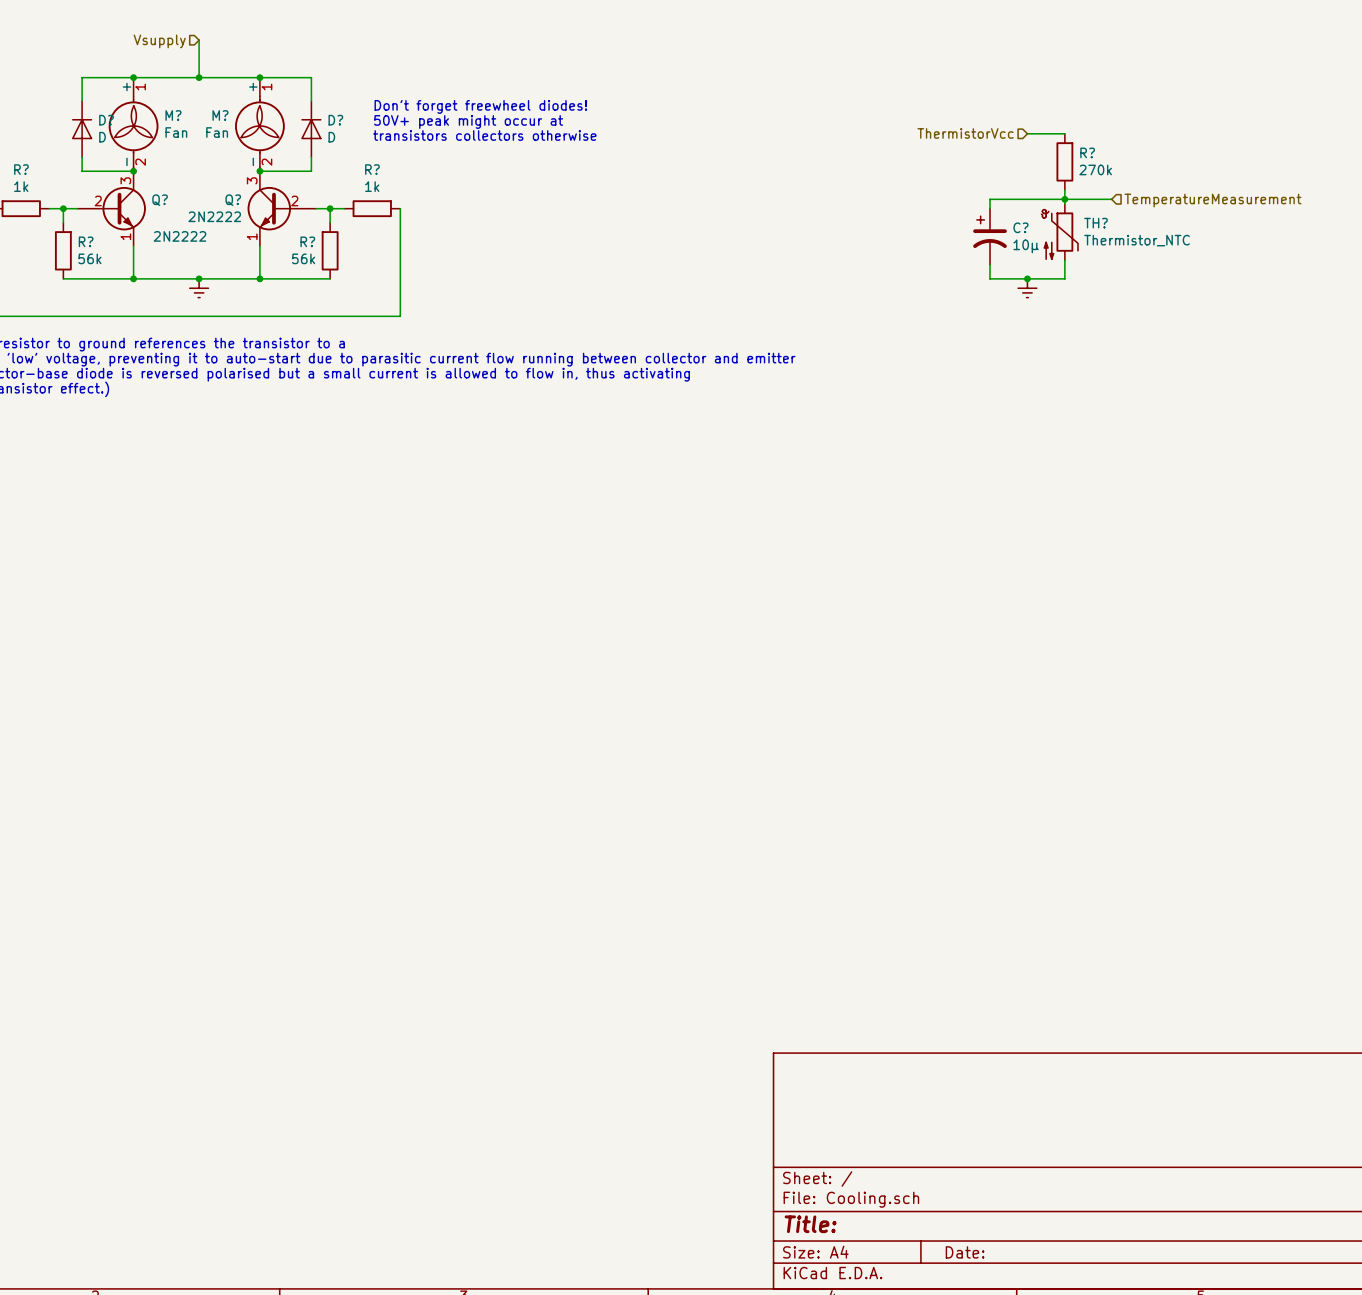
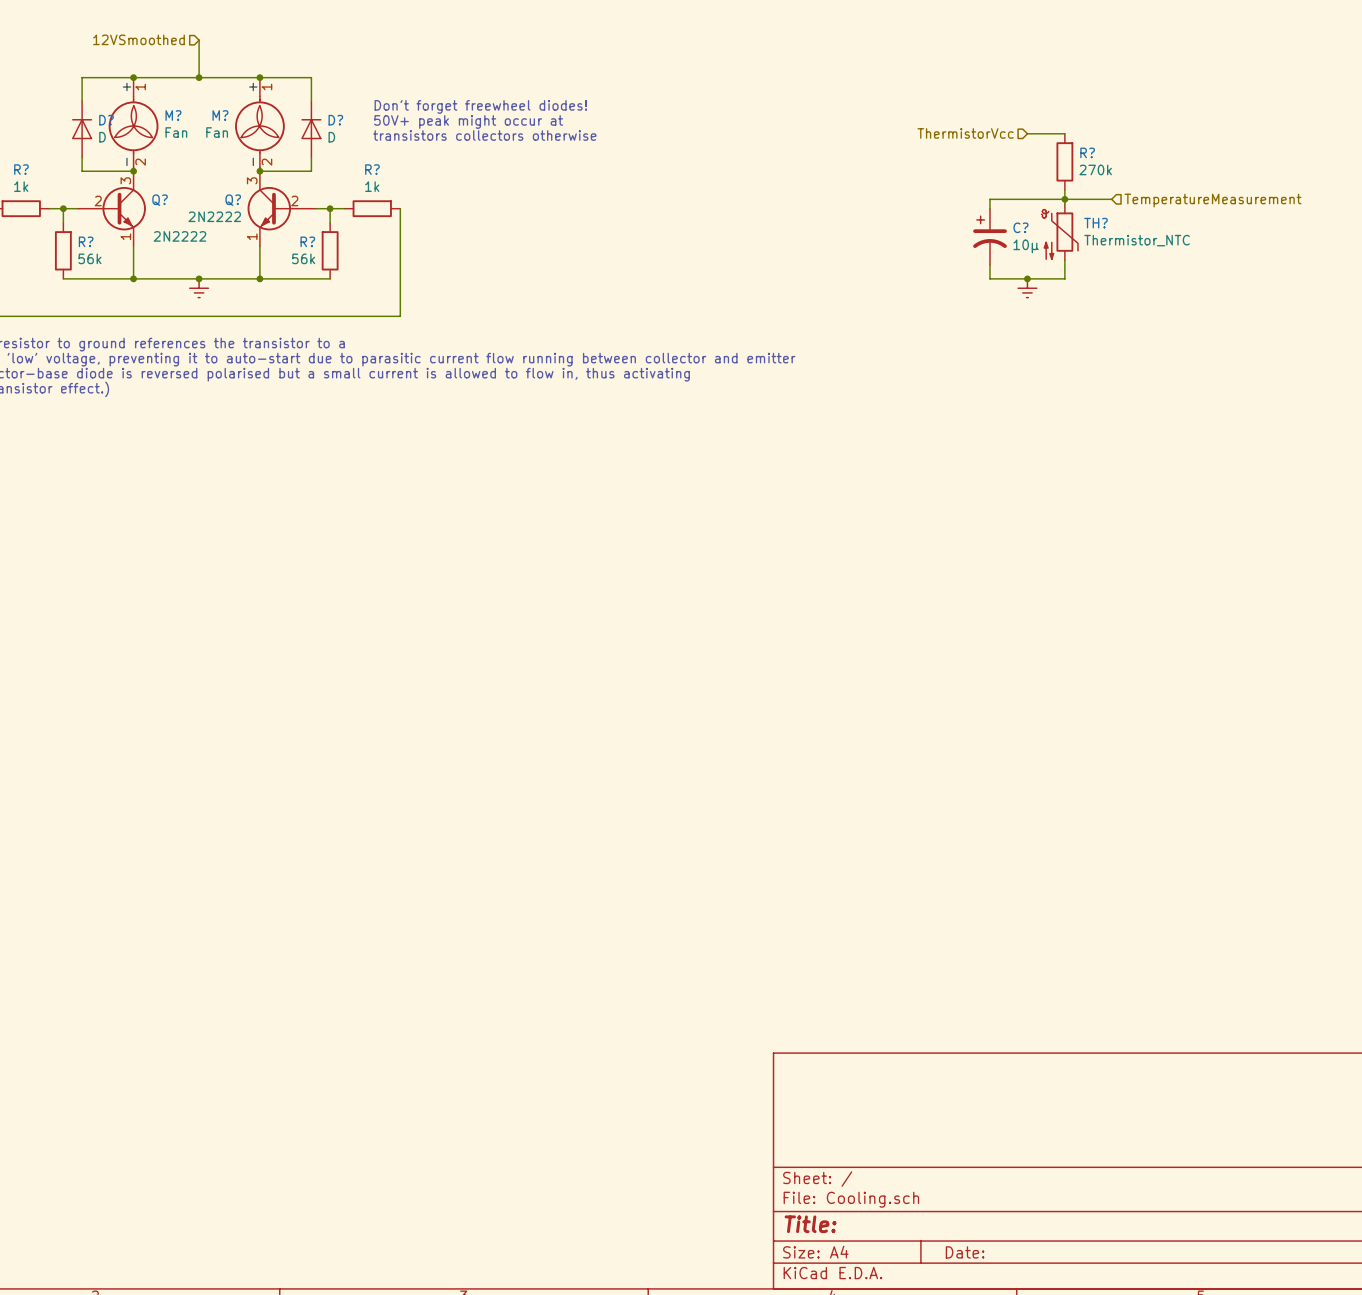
hierarchical label: Vsupply (159, 41) -> 12VSmoothed (138, 39)

